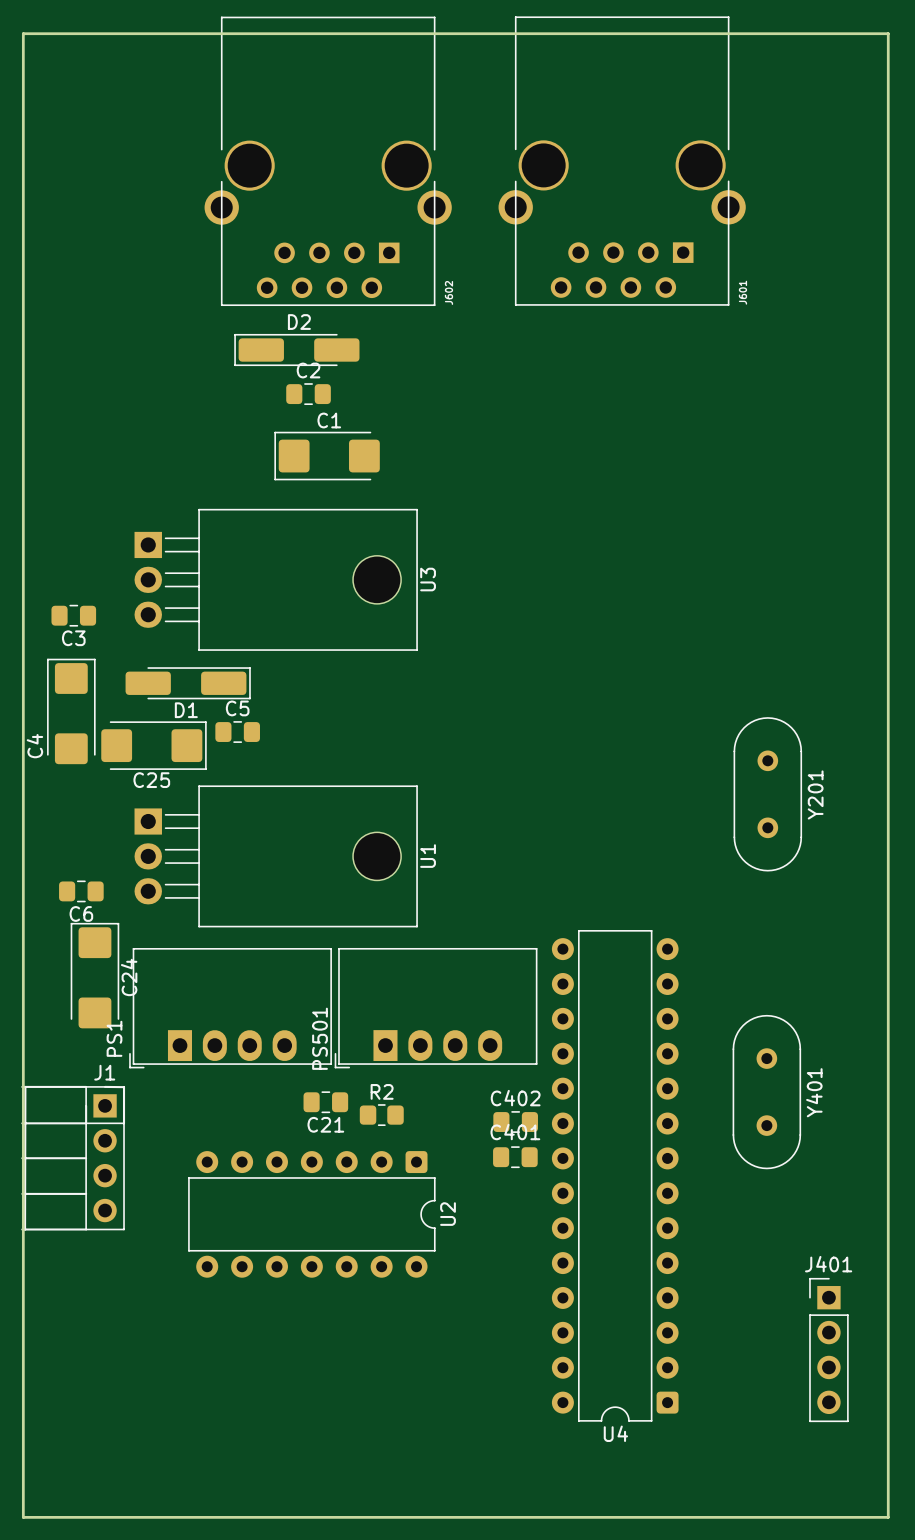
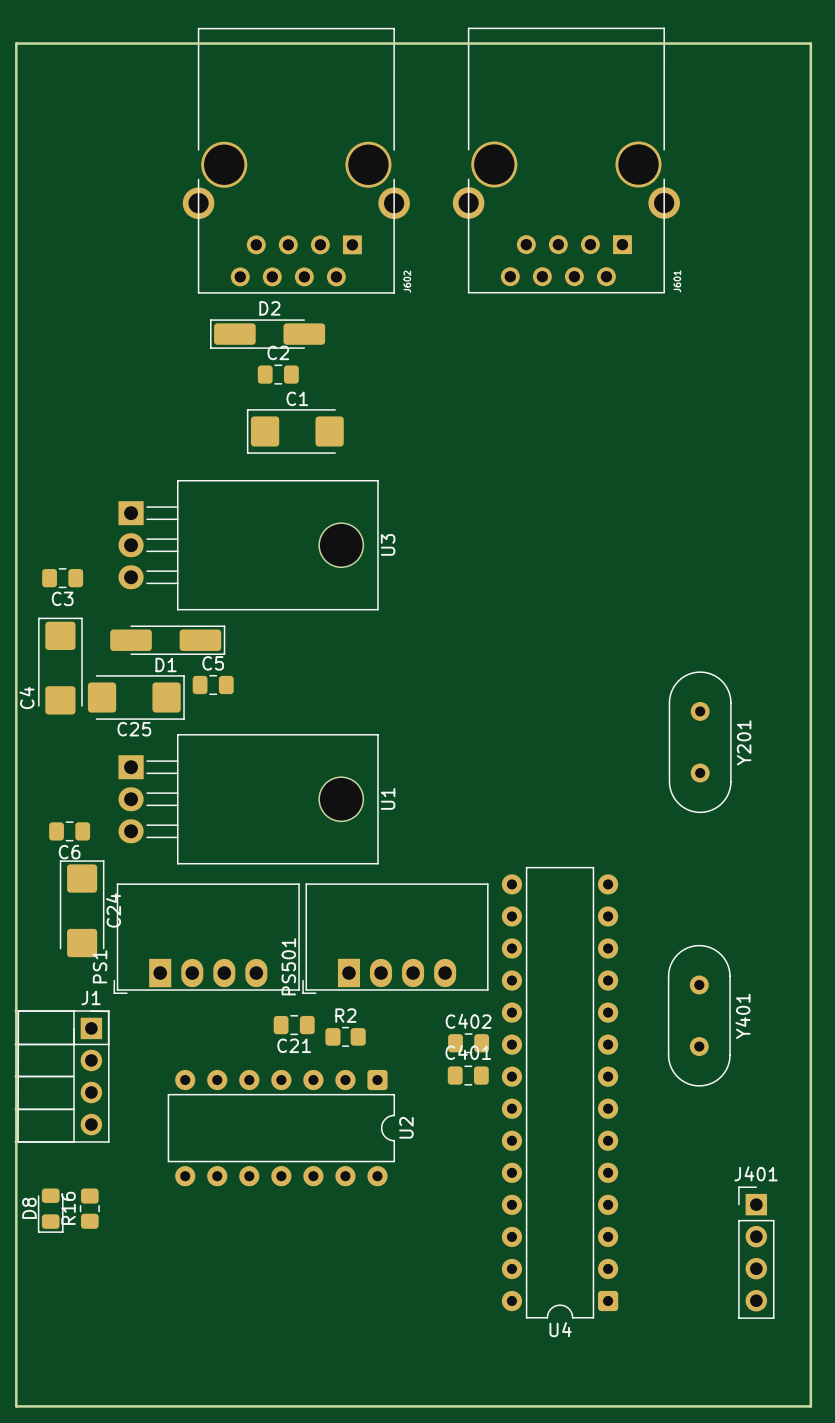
R16: none -> (89, 1208)
D8: none -> (50, 1210)

